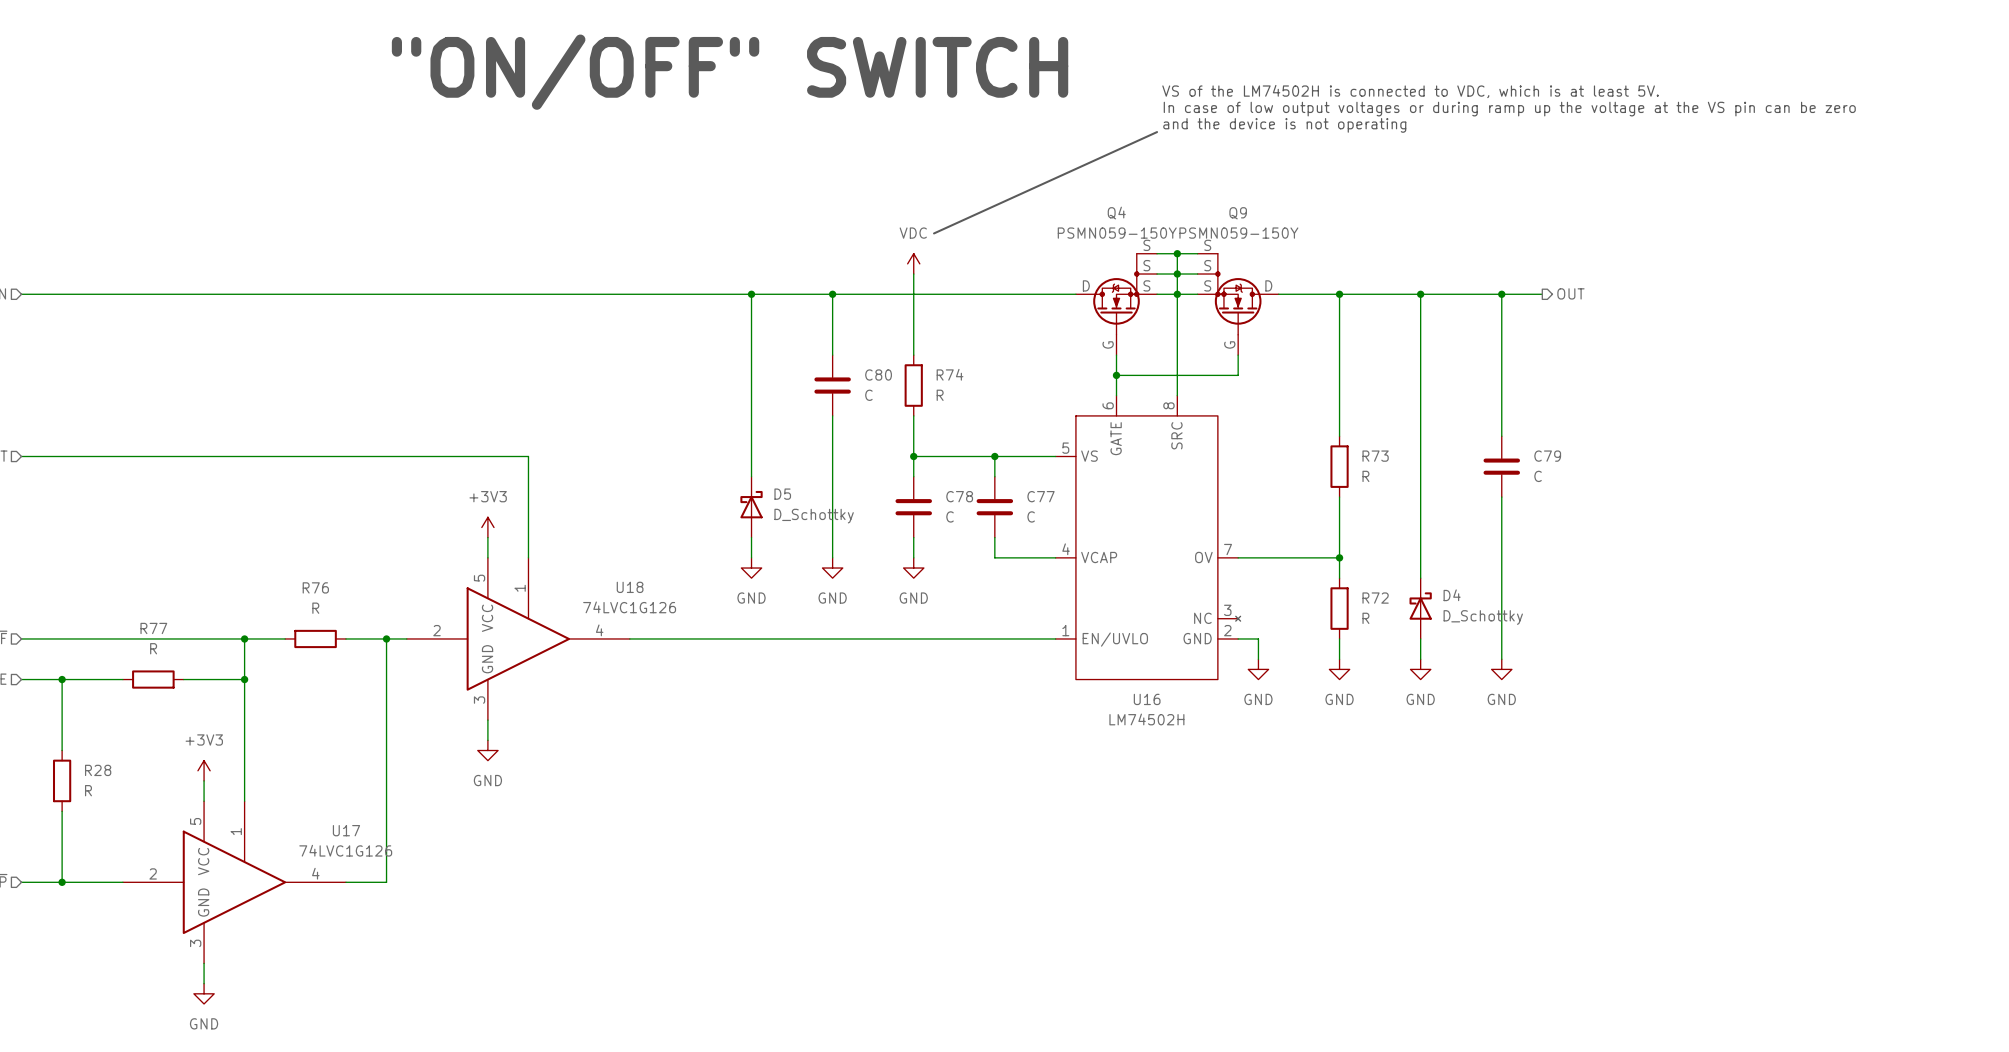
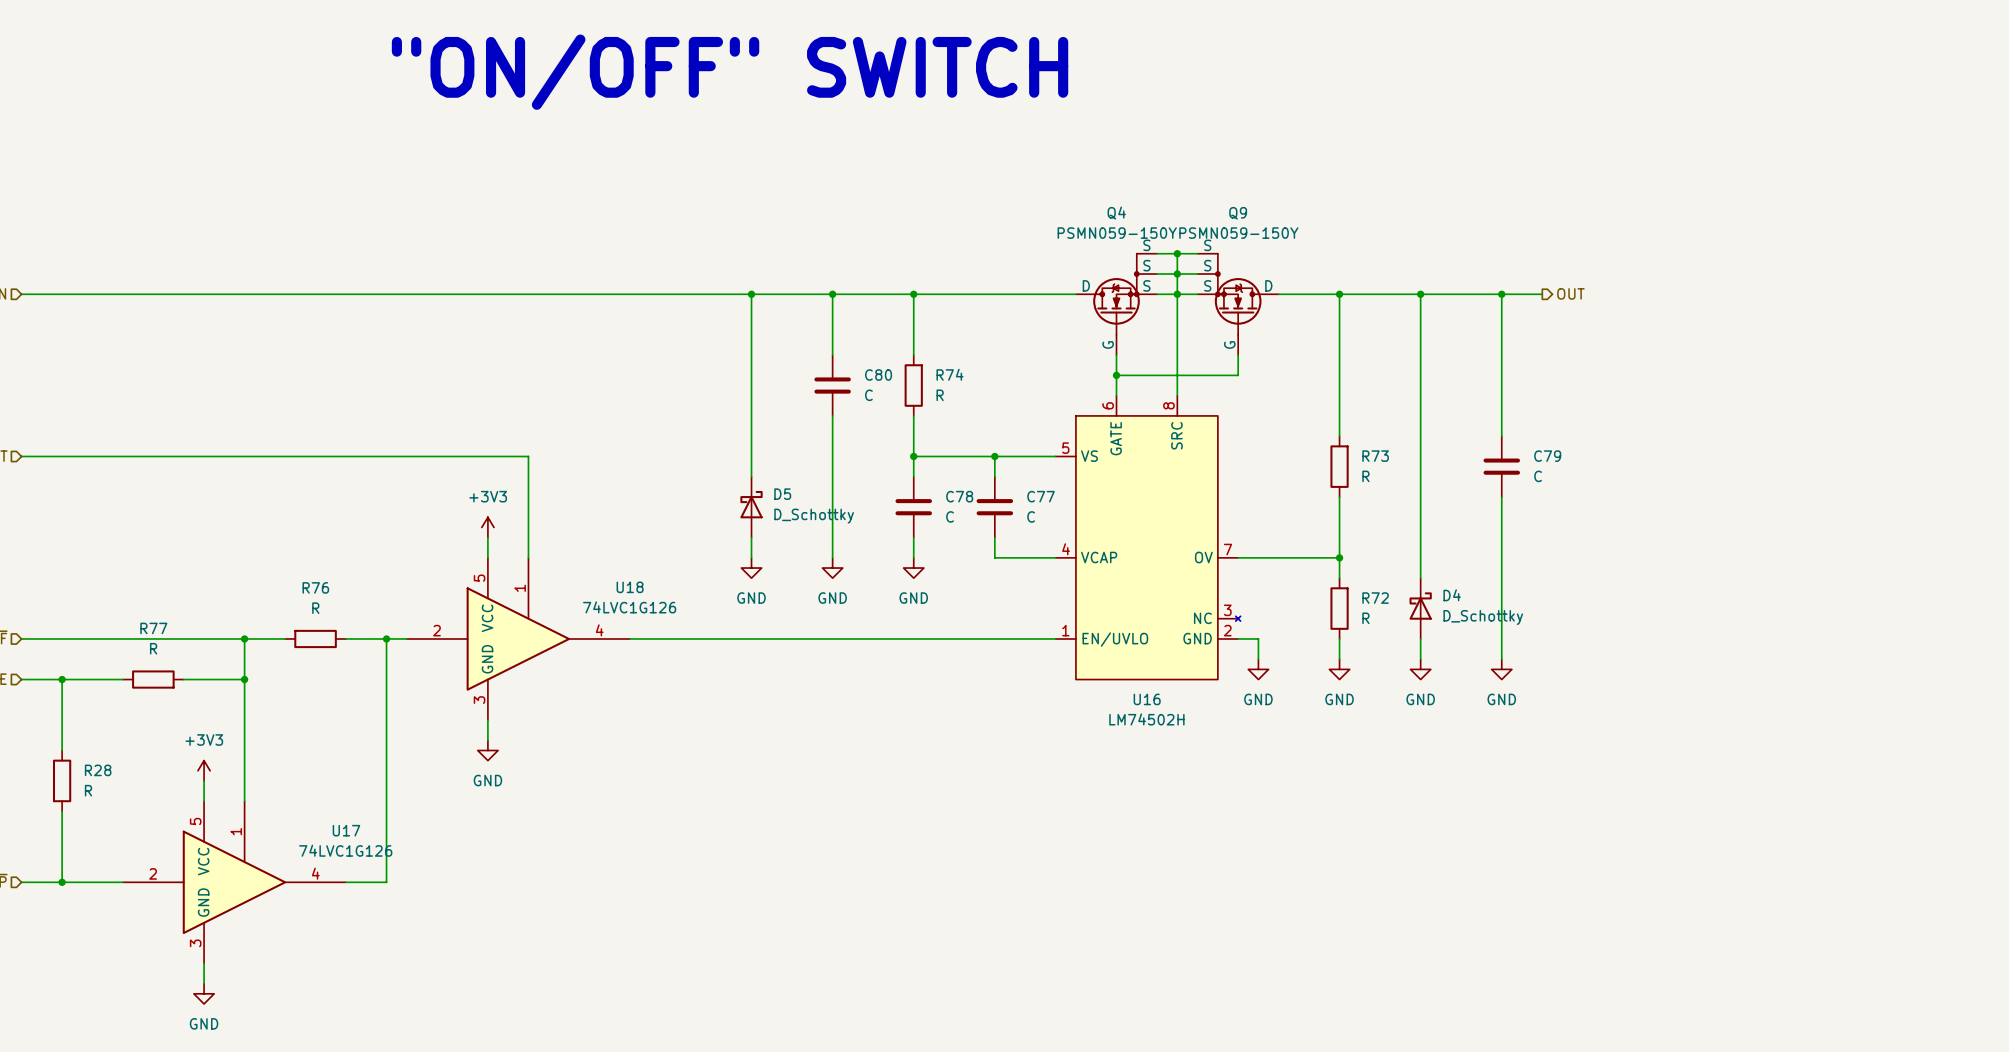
text: VS of the LM74502H is connected to VDC, which is at least 5V. (1410, 91) -> none
text: In case of low output voltages or during ramp up the voltage at the VS pin can be zero (1509, 109) -> none
text: and the device is not operating (1284, 125) -> none
line: (1157, 132) (934, 233) -> none
power symbol: VDC (913, 263) -> none
wire: (913, 274) (913, 294) -> none
junction: none -> (913, 294)

